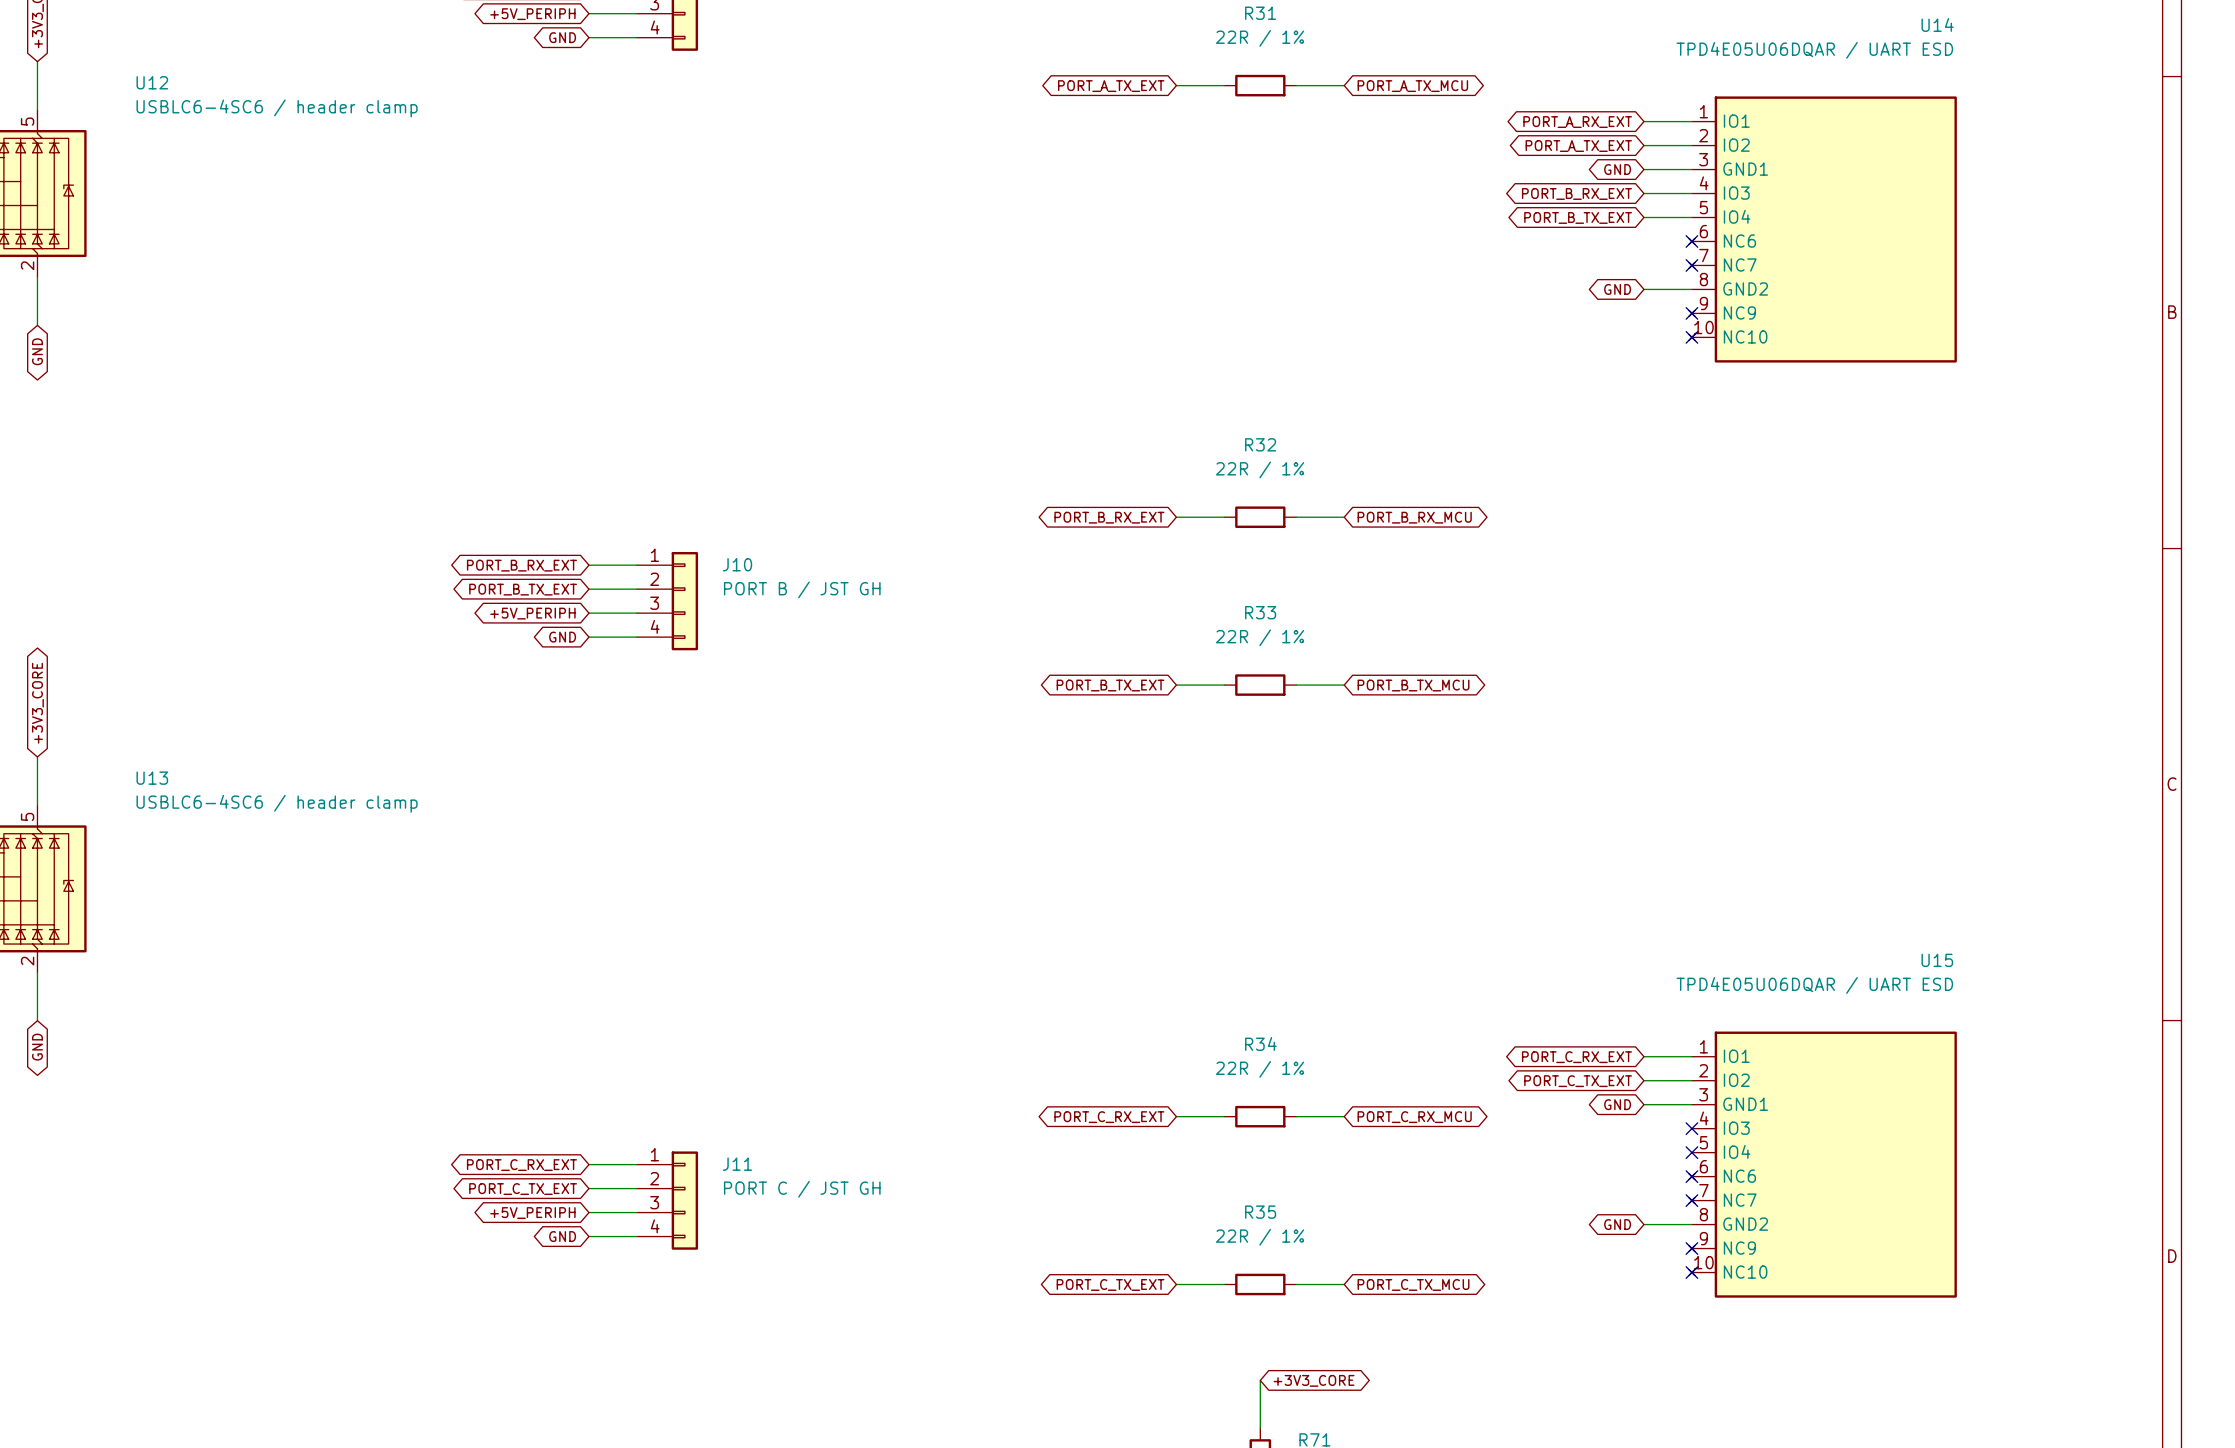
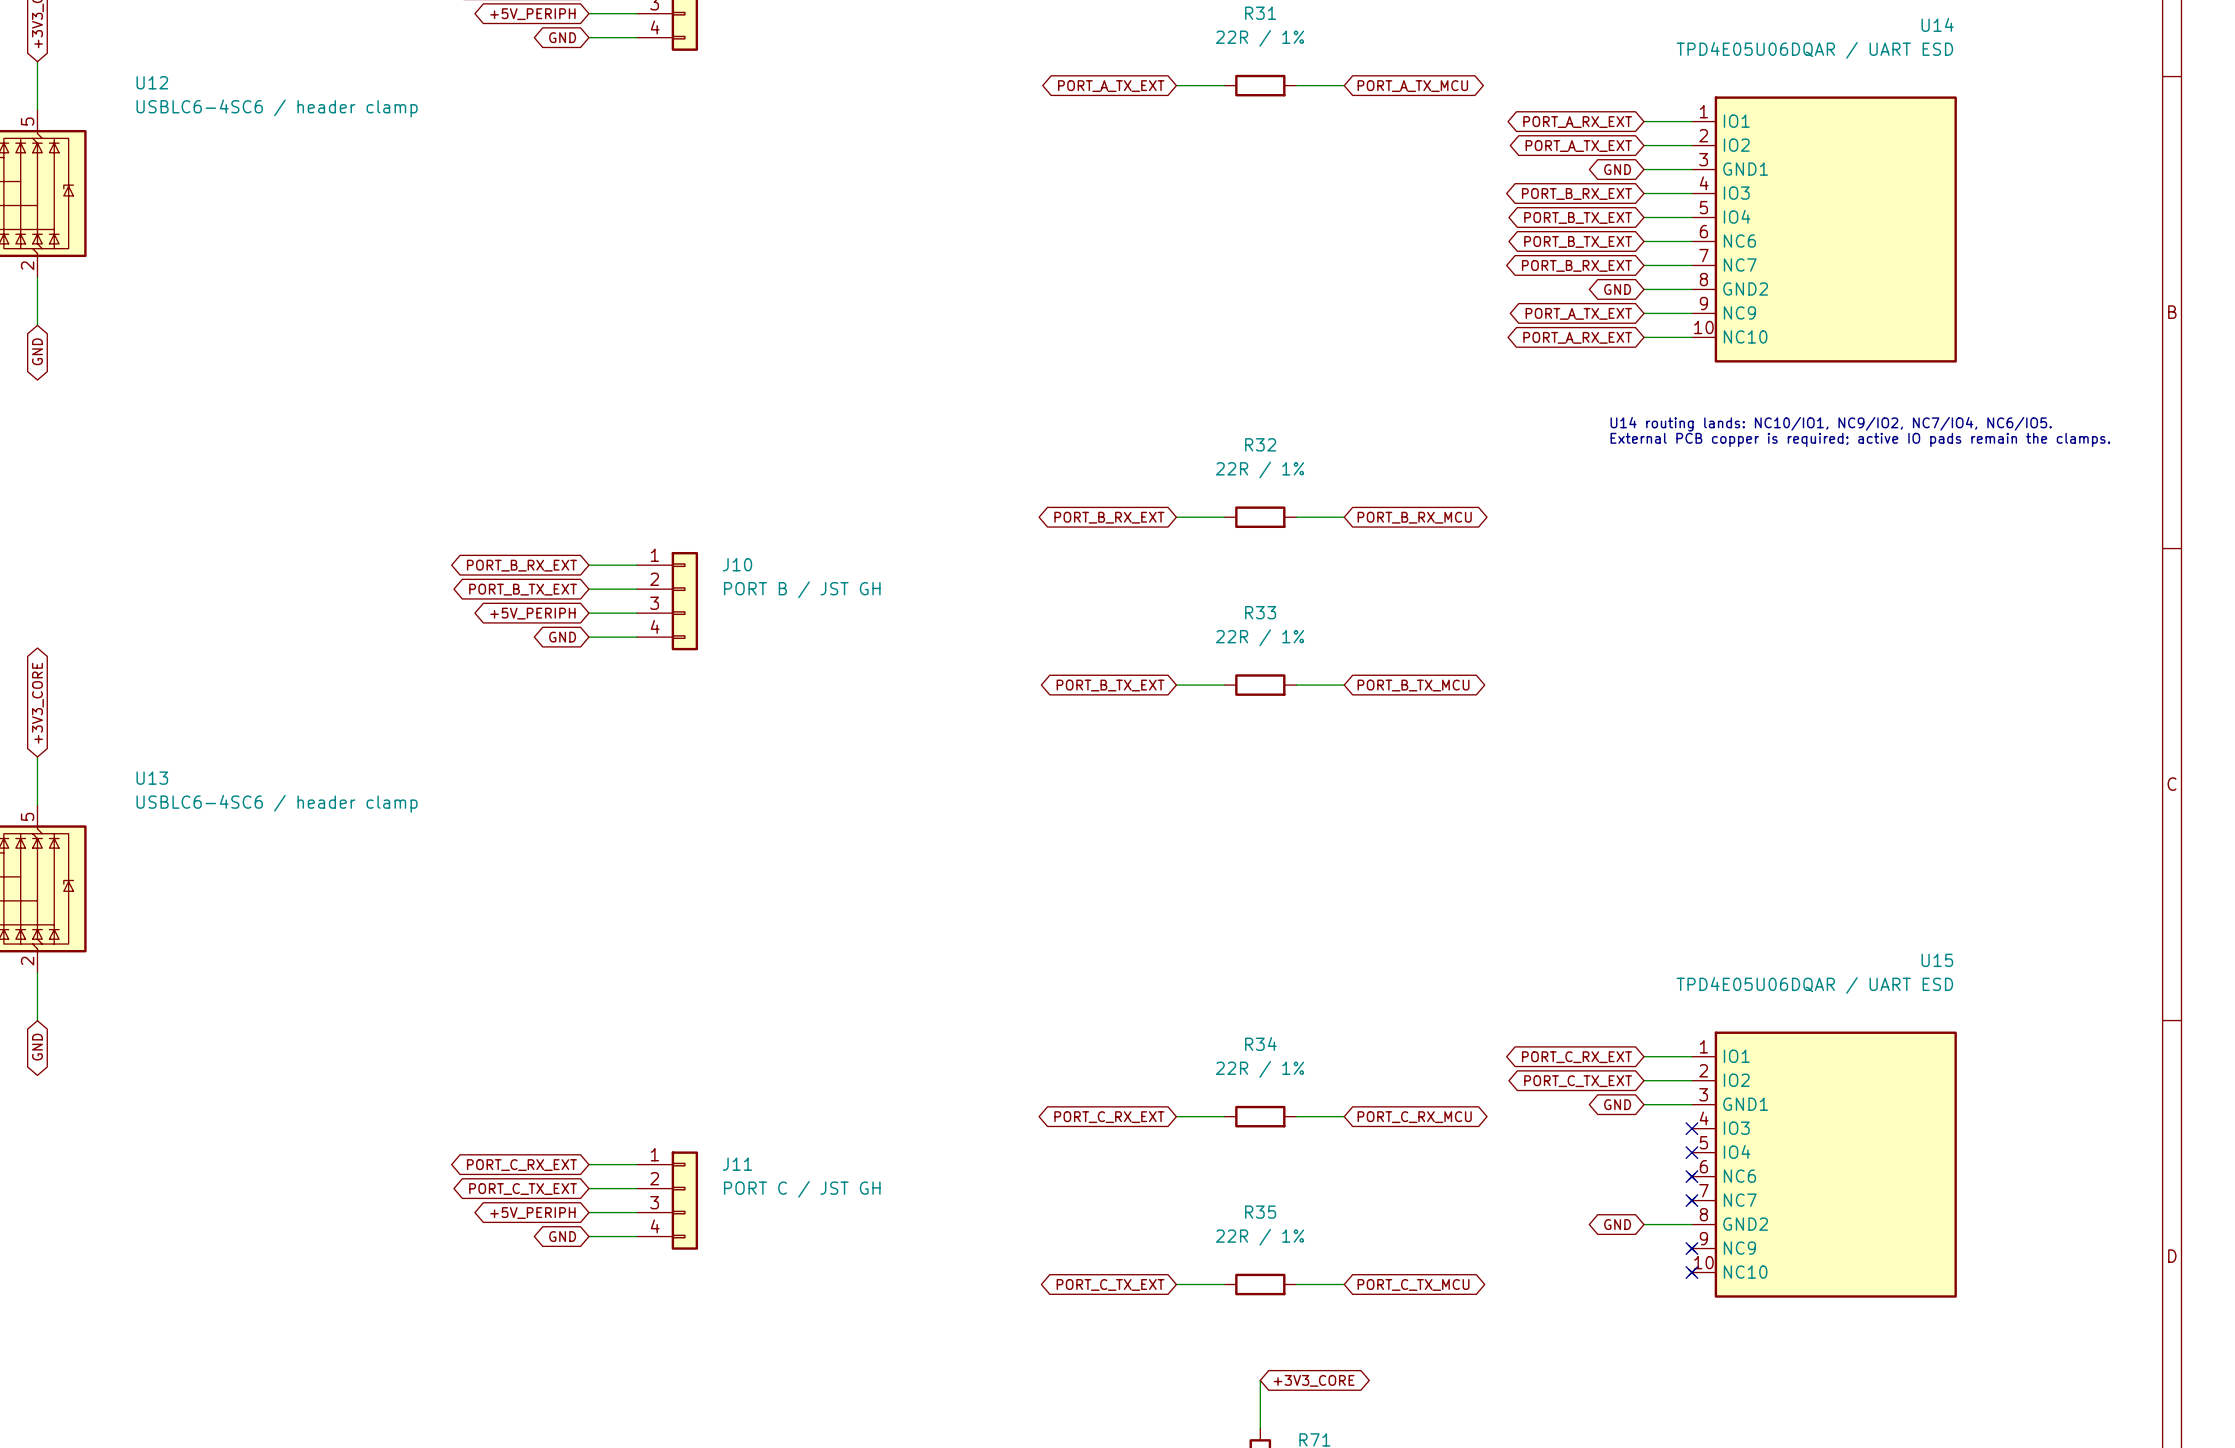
U14 symbol: [1689, 96, 1957, 363] -> [1691, 96, 1957, 363]
global label: none -> PORT_B_TX_EXT (1578, 241)
wire: none -> (1643, 241) (1691, 241)
no-connect mark: (1691, 241) -> none
global label: none -> PORT_B_RX_EXT (1576, 265)
wire: none -> (1643, 265) (1691, 265)
no-connect mark: (1691, 265) -> none
global label: none -> PORT_A_TX_EXT (1578, 313)
wire: none -> (1643, 313) (1691, 313)
no-connect mark: (1691, 313) -> none
global label: none -> PORT_A_RX_EXT (1577, 337)
wire: none -> (1643, 337) (1691, 337)
no-connect mark: (1691, 337) -> none
text: none -> U14 routing lands: NC10/IO1, NC9/IO2, NC7/IO4, NC6/IO5. (1831, 424)
text: none -> External PCB copper is required; active IO pads remain the clamps. (1860, 439)

